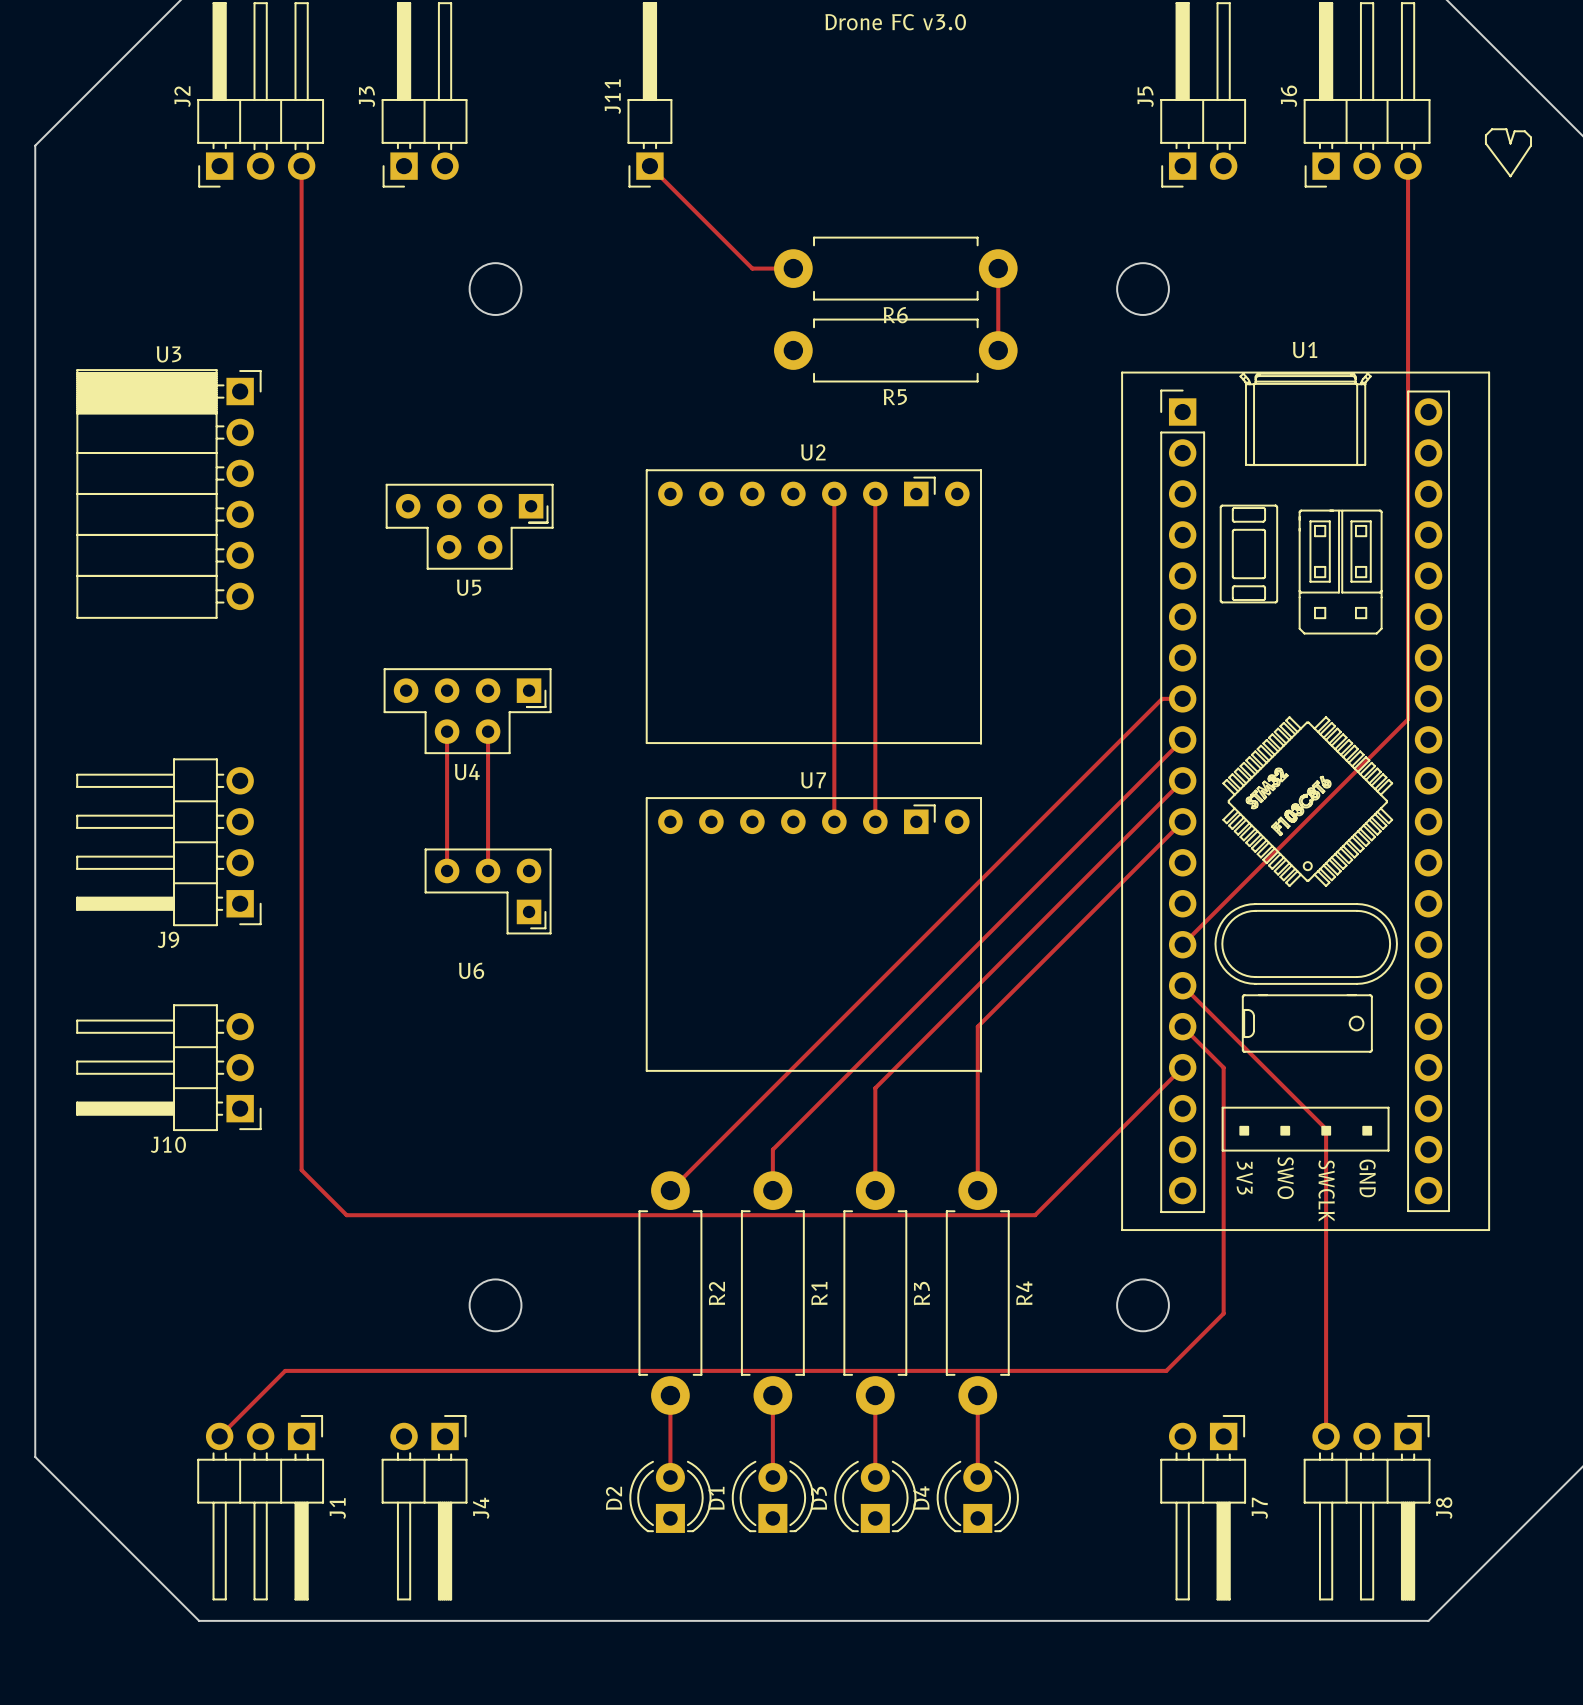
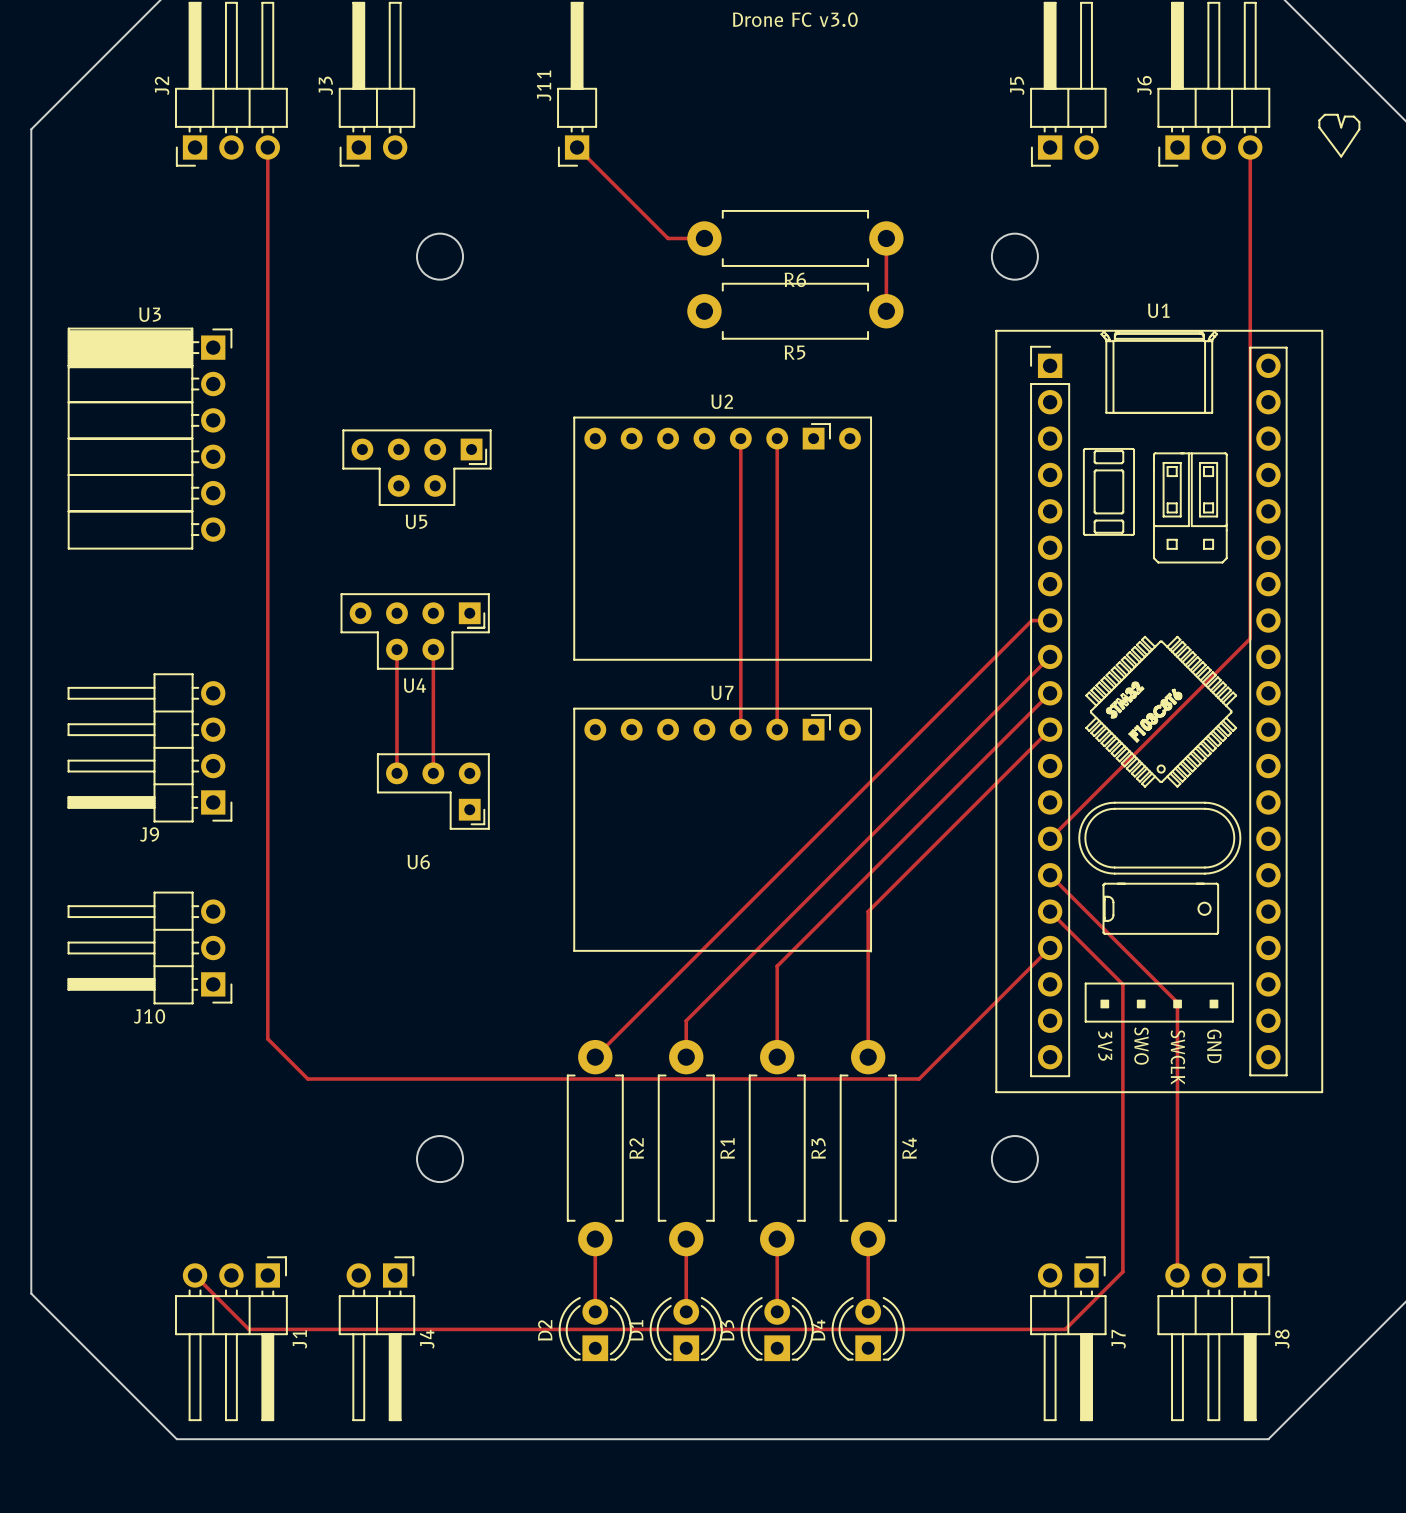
track: (1223, 1067) (1223, 1313) (1166, 1370) (285, 1370) (219, 1436) -> (1086, 948) (1122, 984) (1122, 1271) (1065, 1329) (248, 1329) (195, 1275)

